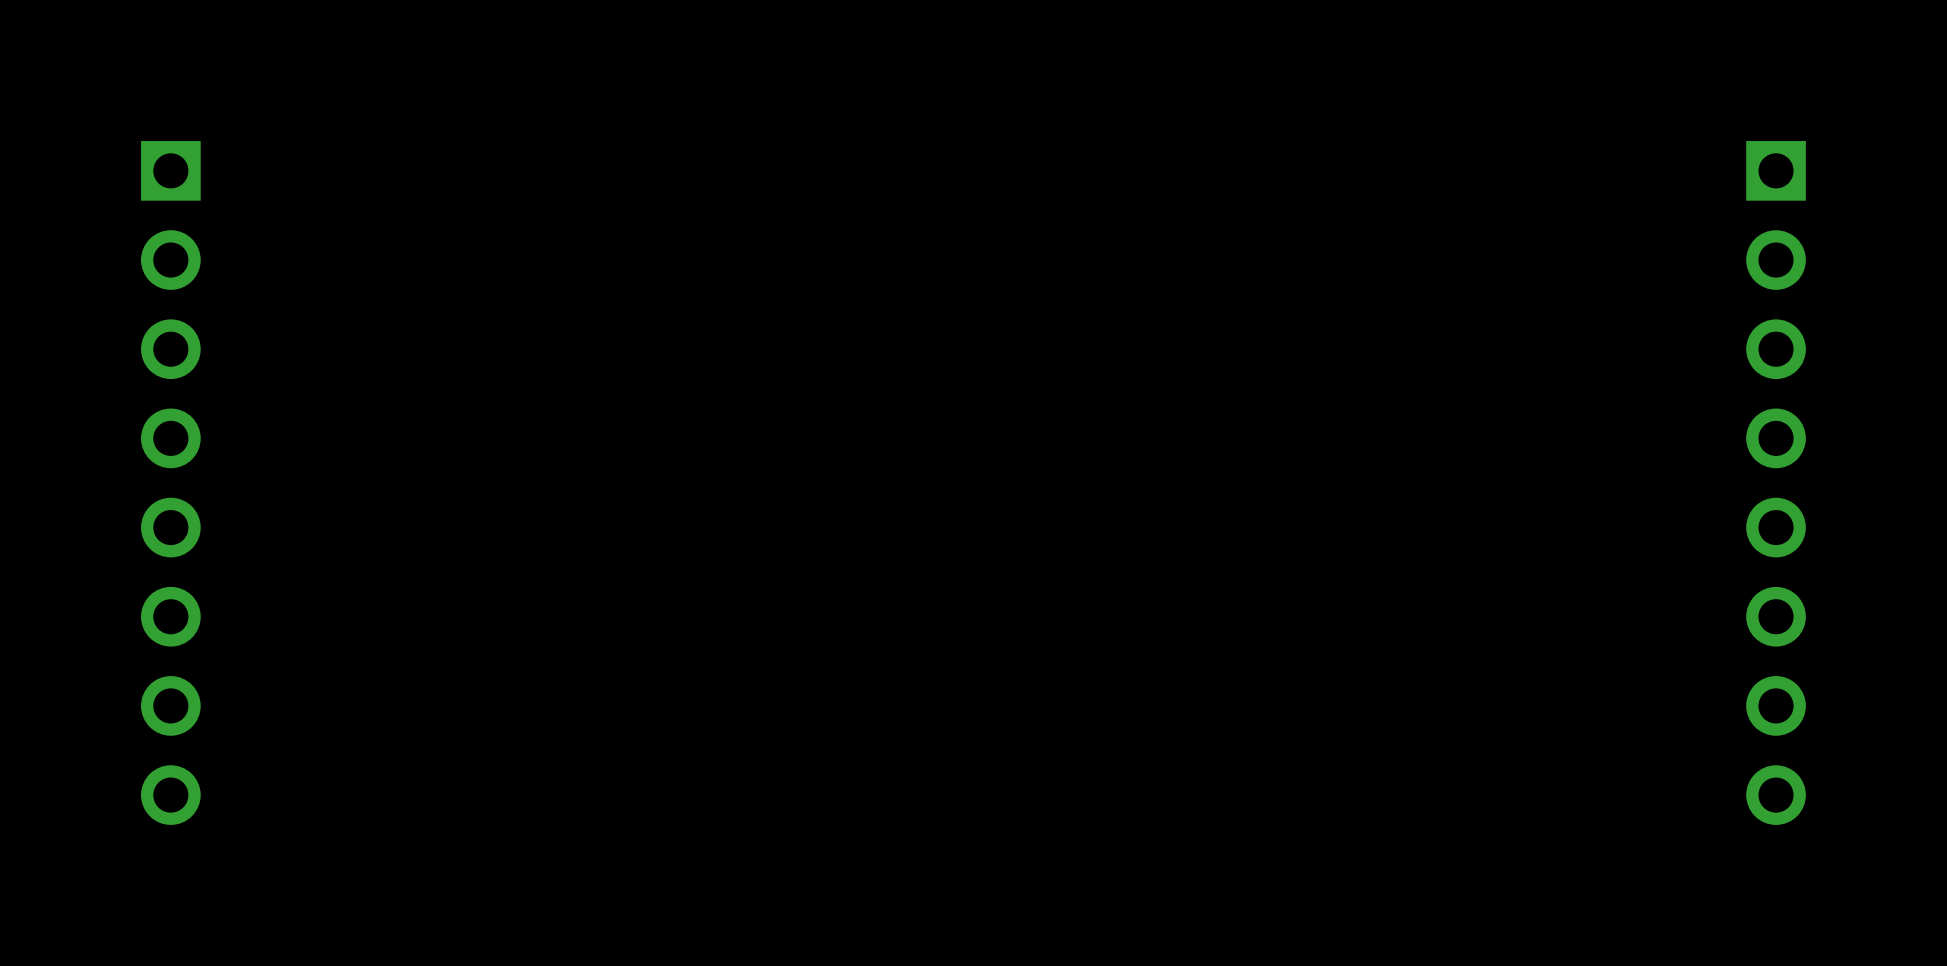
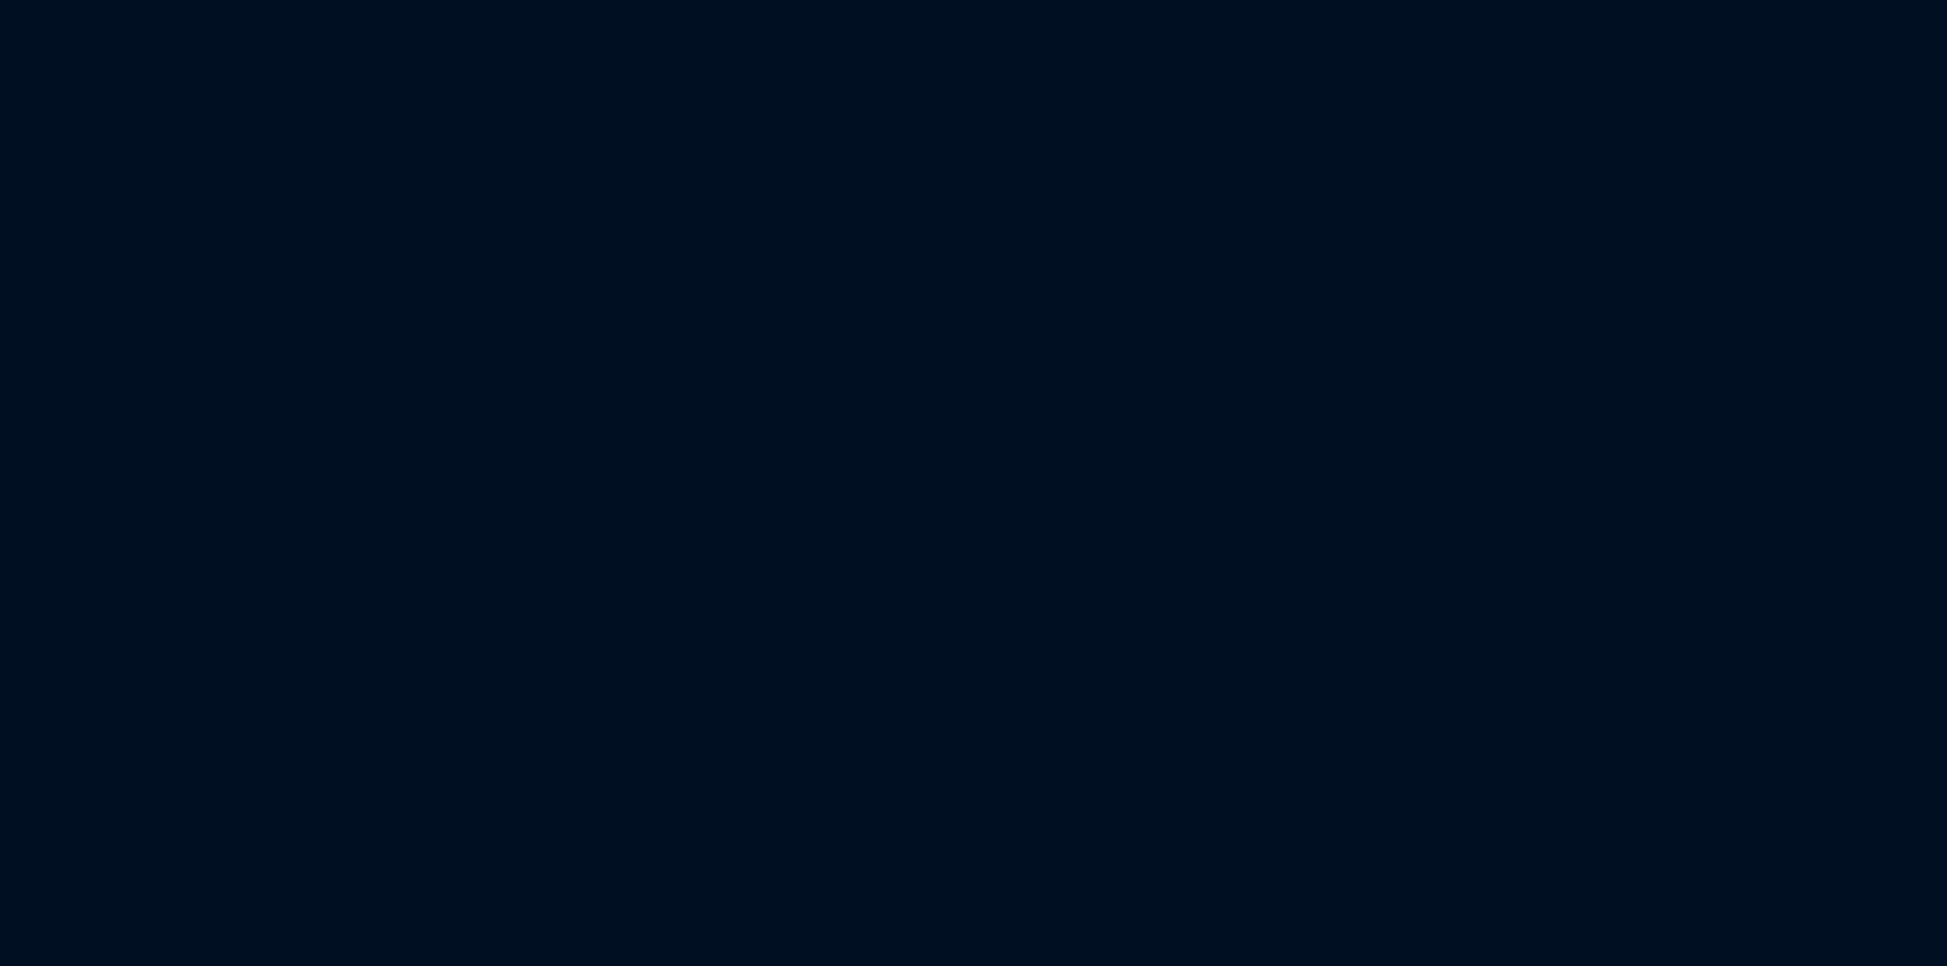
part: (170, 482) -> none
part: (1776, 482) -> none

